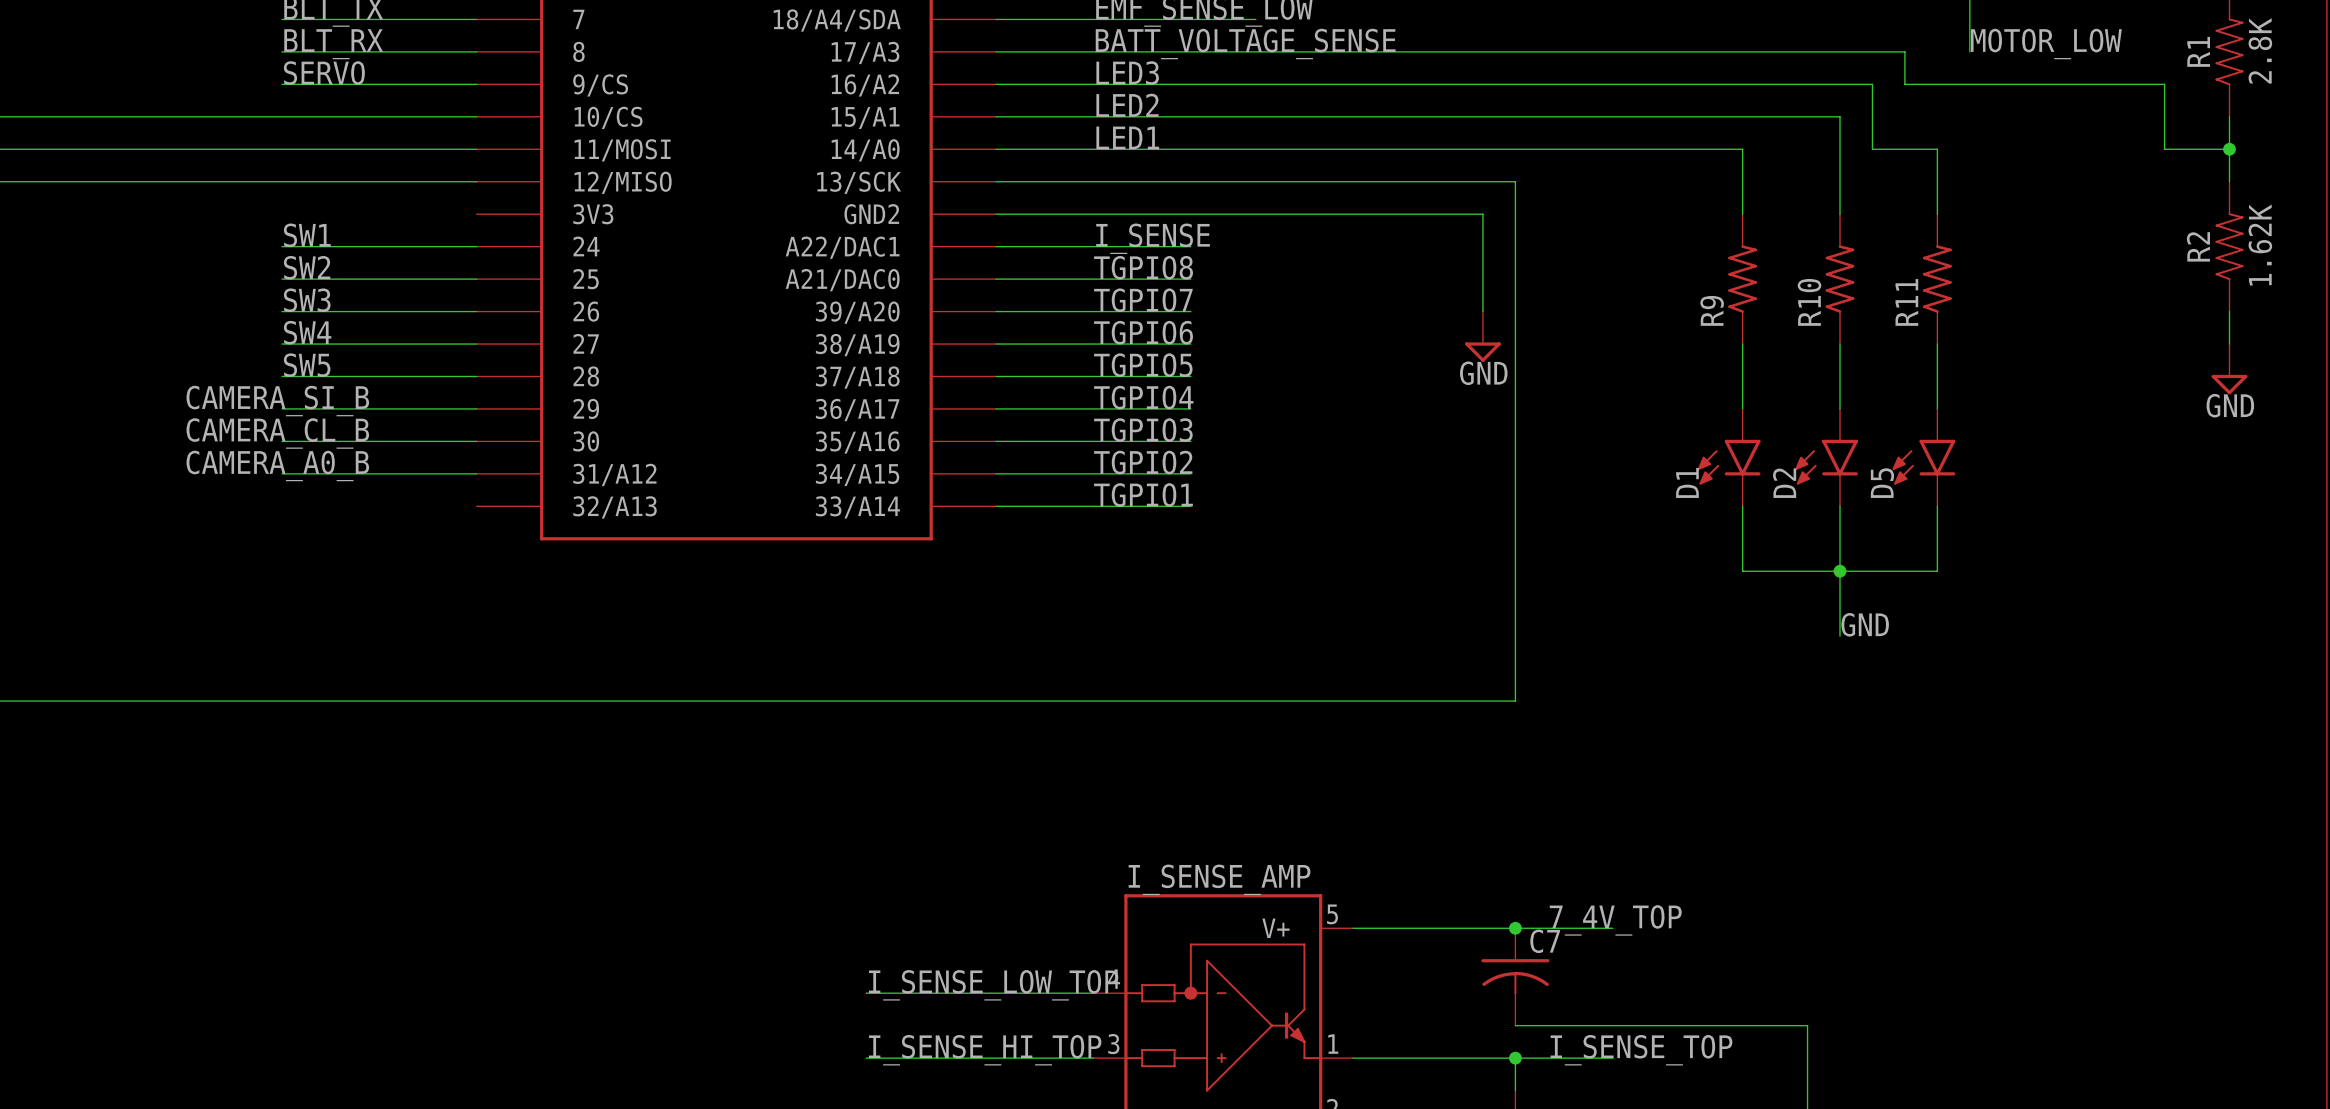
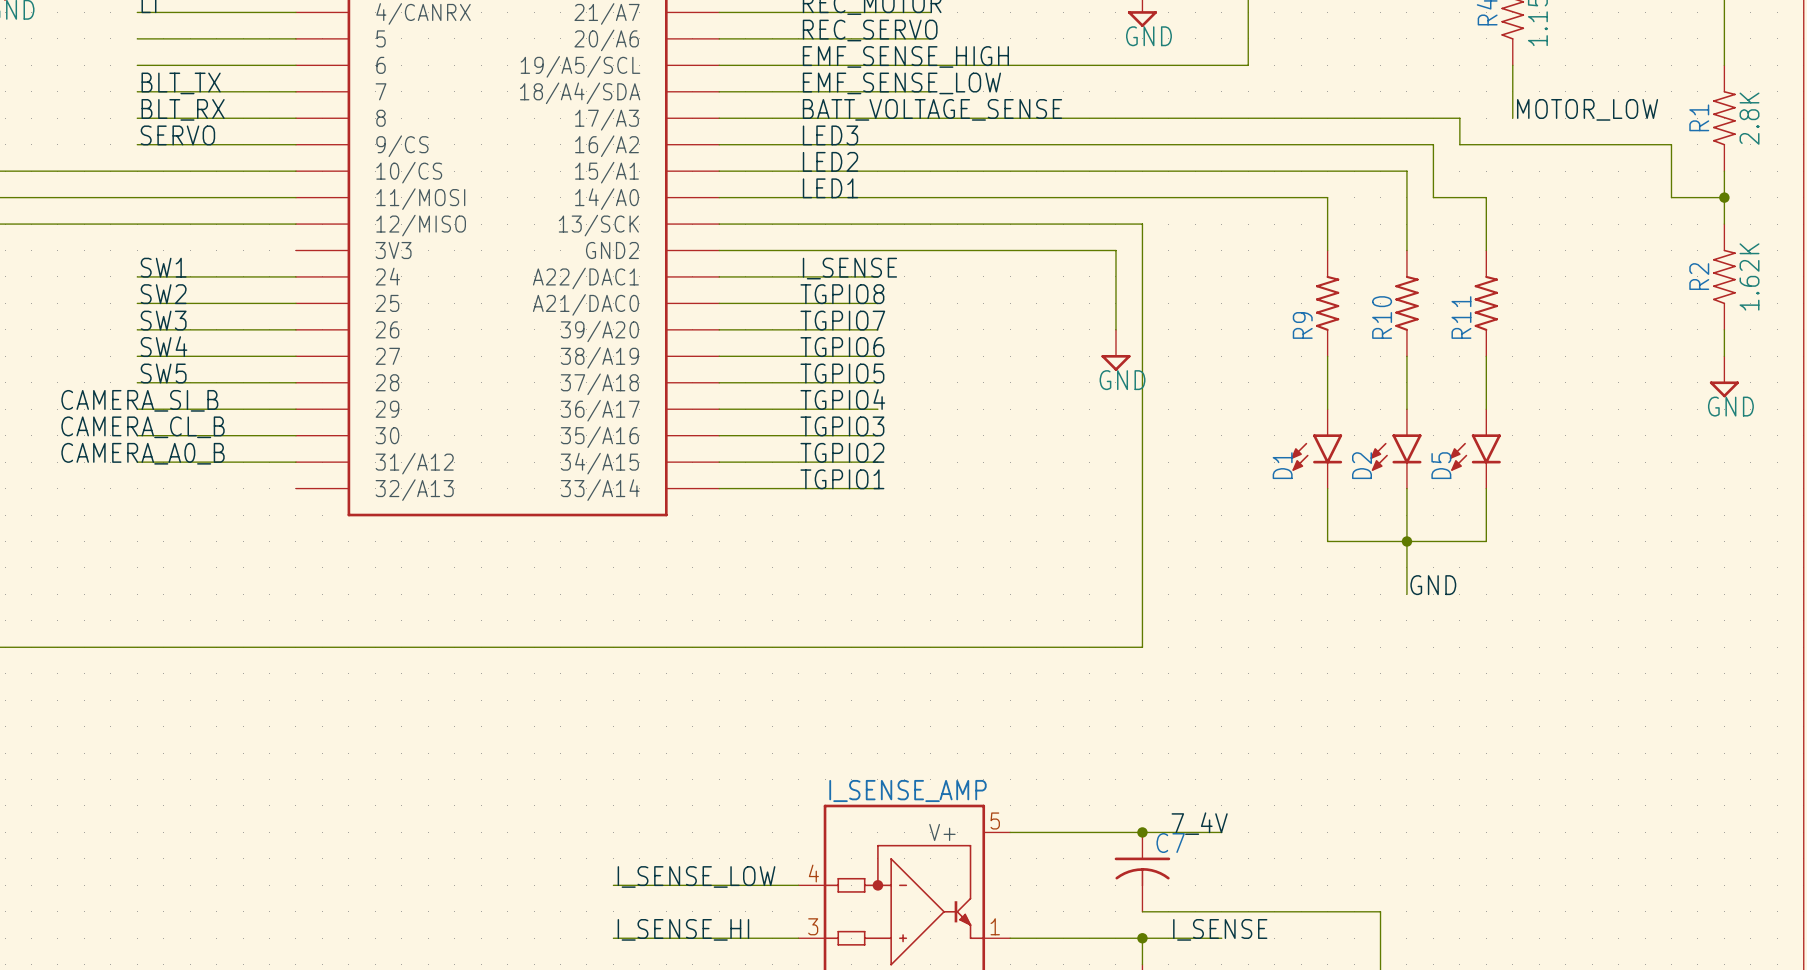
label: 7_4V_TOP (1615, 920) -> 7_4V (1199, 823)
label: I_SENSE_LOW_TOP (993, 985) -> I_SENSE_LOW (696, 876)
label: I_SENSE_HI_TOP (985, 1050) -> I_SENSE_HI (683, 929)
label: I_SENSE_TOP (1641, 1050) -> I_SENSE (1220, 929)

